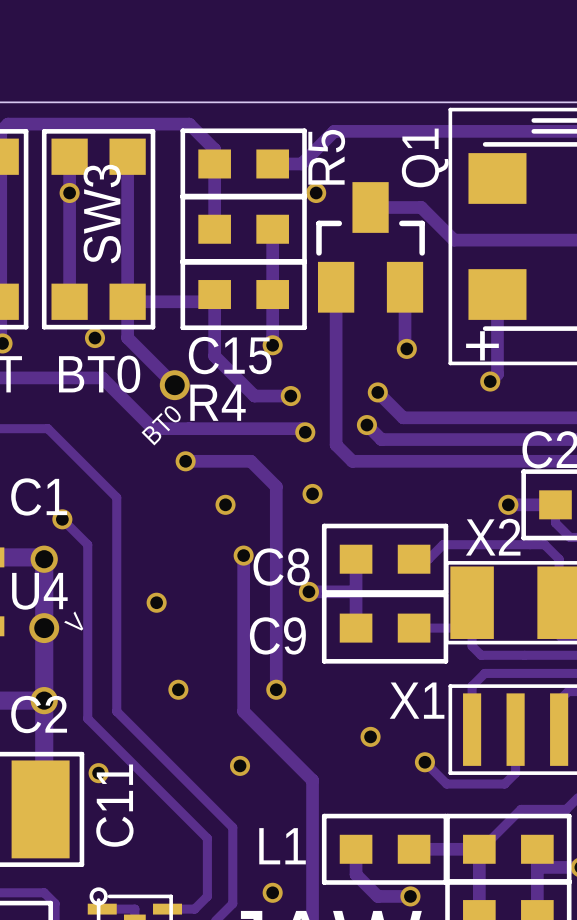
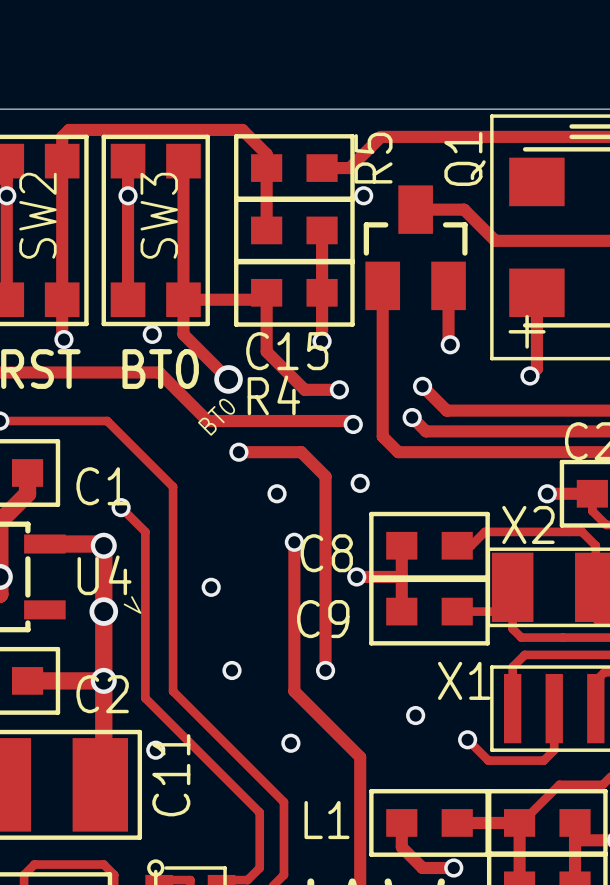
via: (272, 892) -> none

